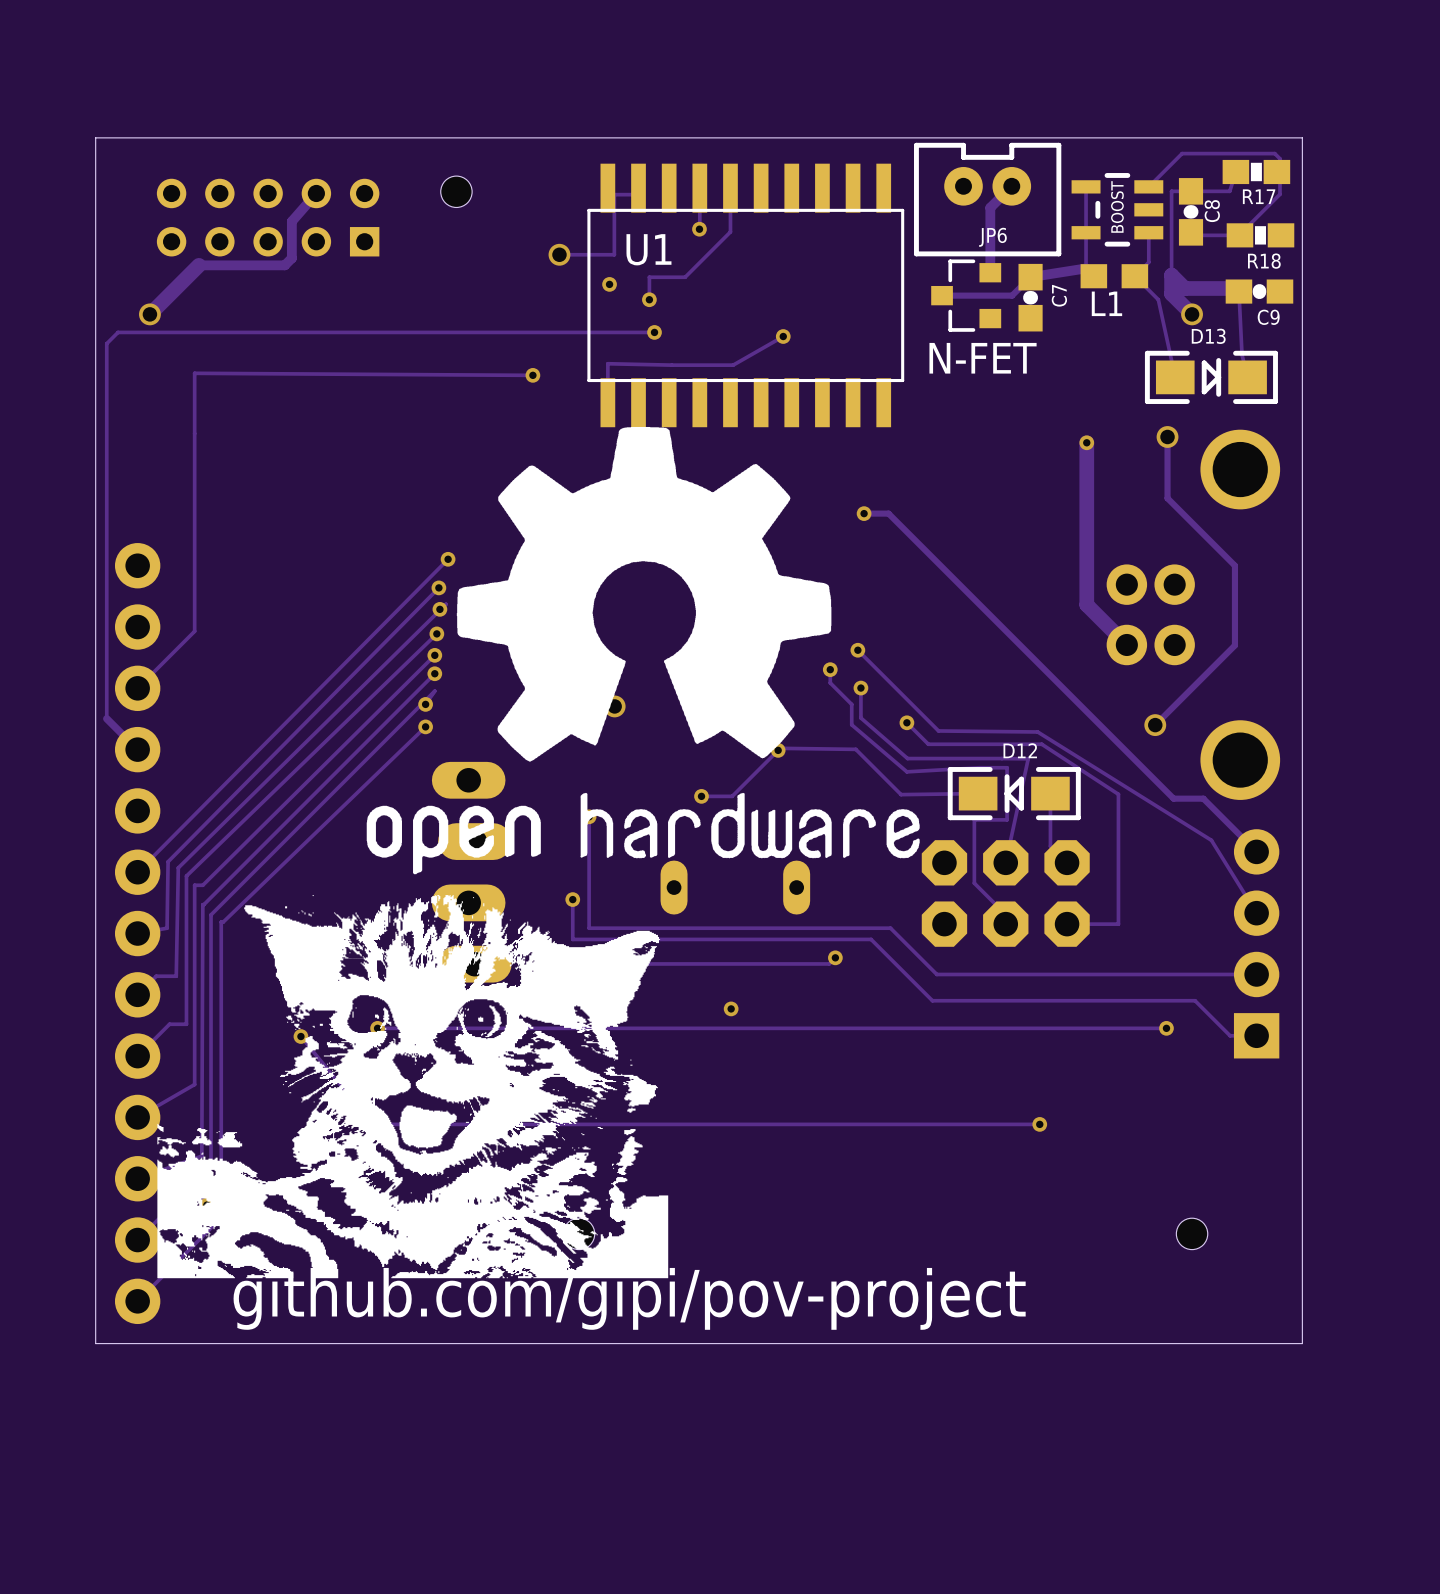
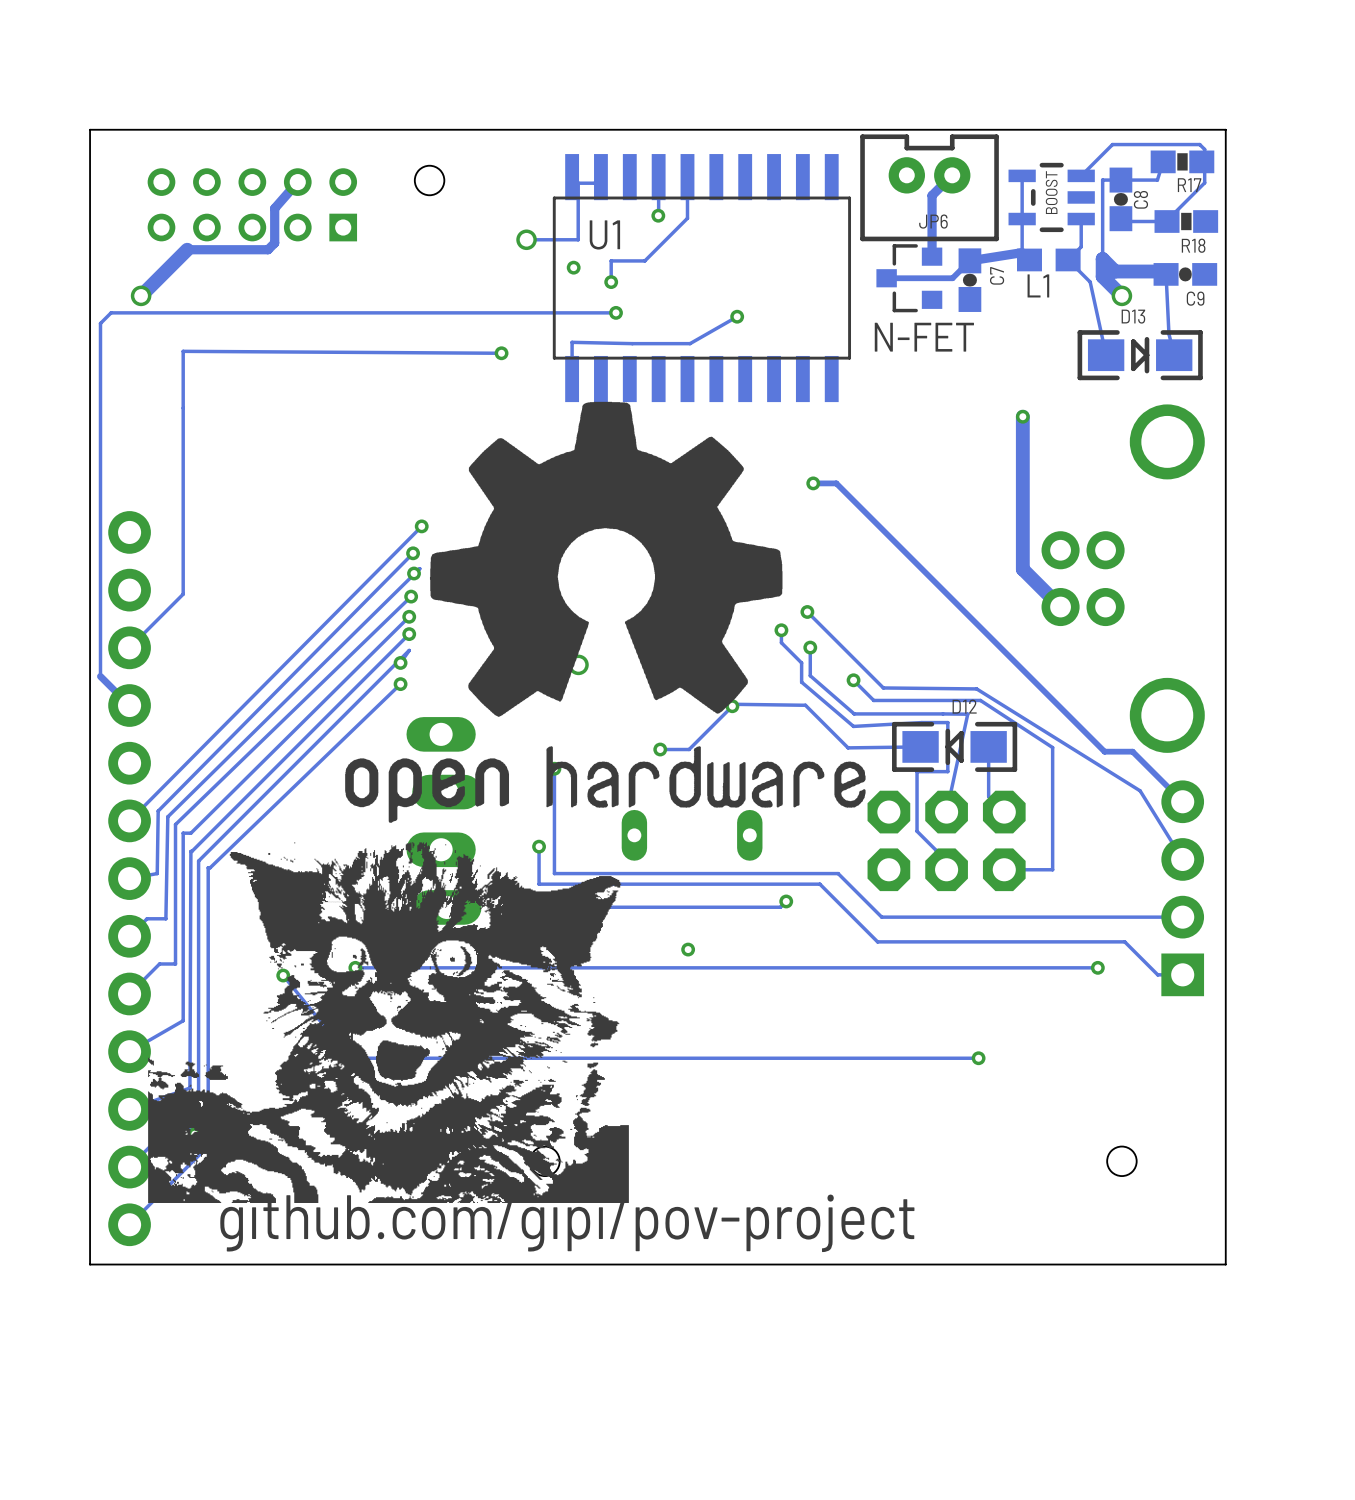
track: (1167, 436) (1167, 498) (1234, 565) (1234, 645) (1155, 725) -> none
via: (1167, 436) -> none
via: (1155, 725) -> none

